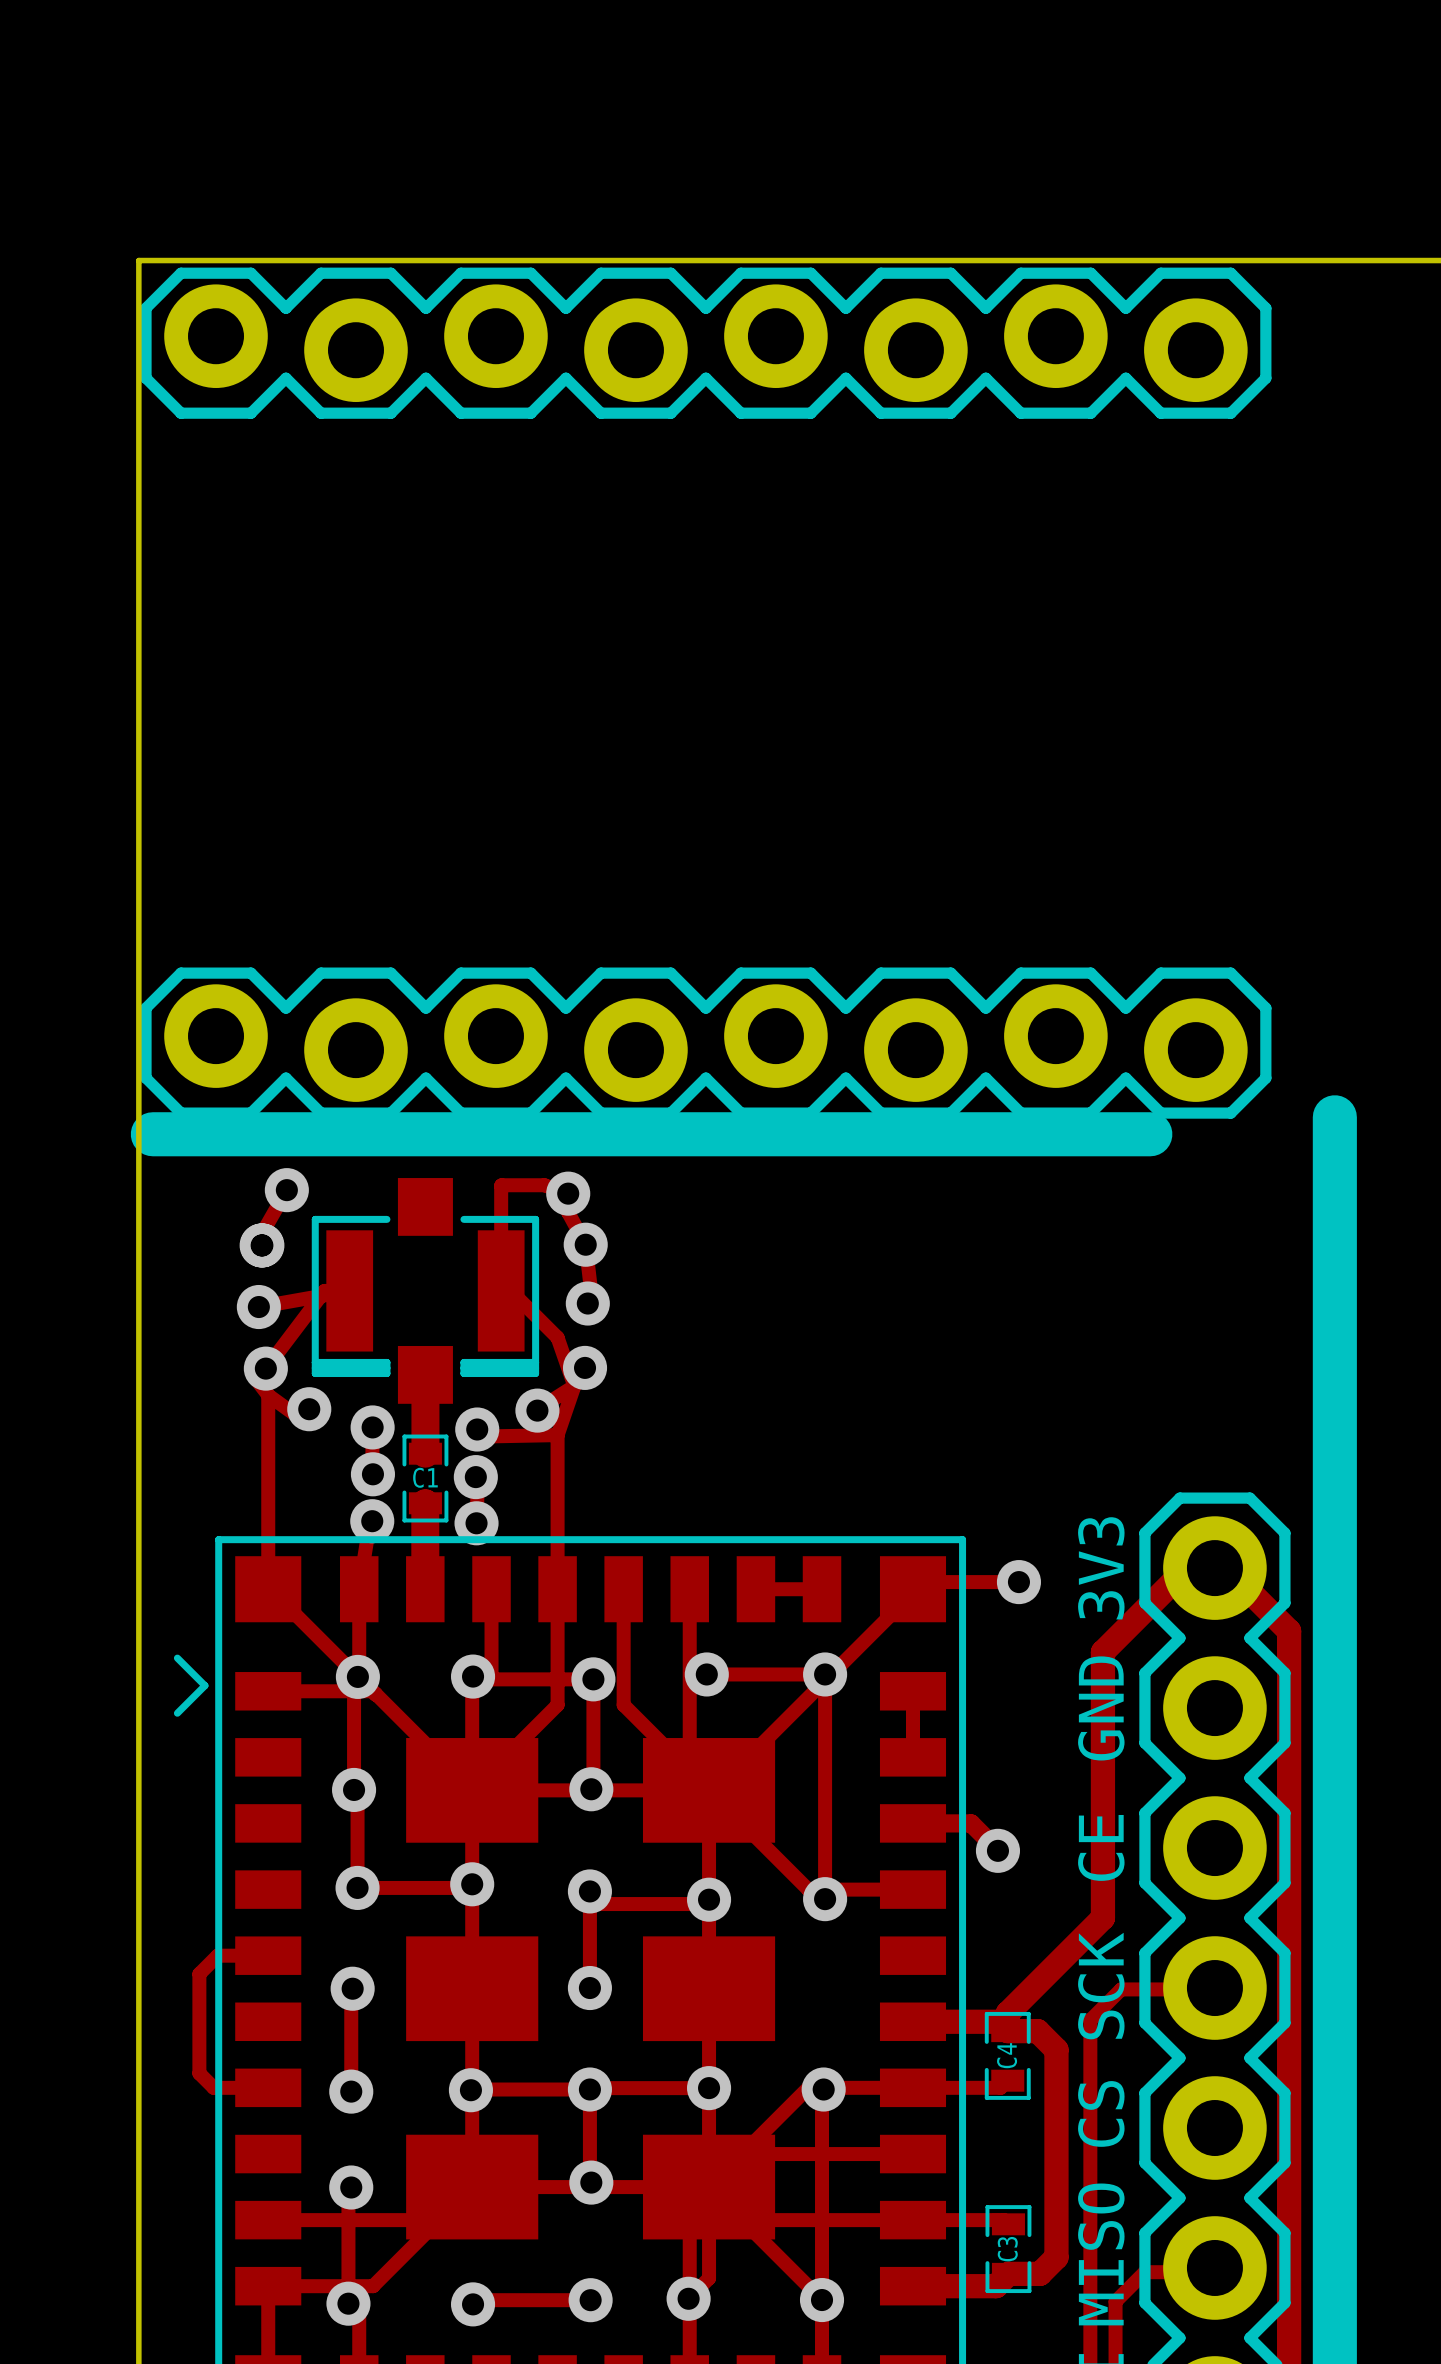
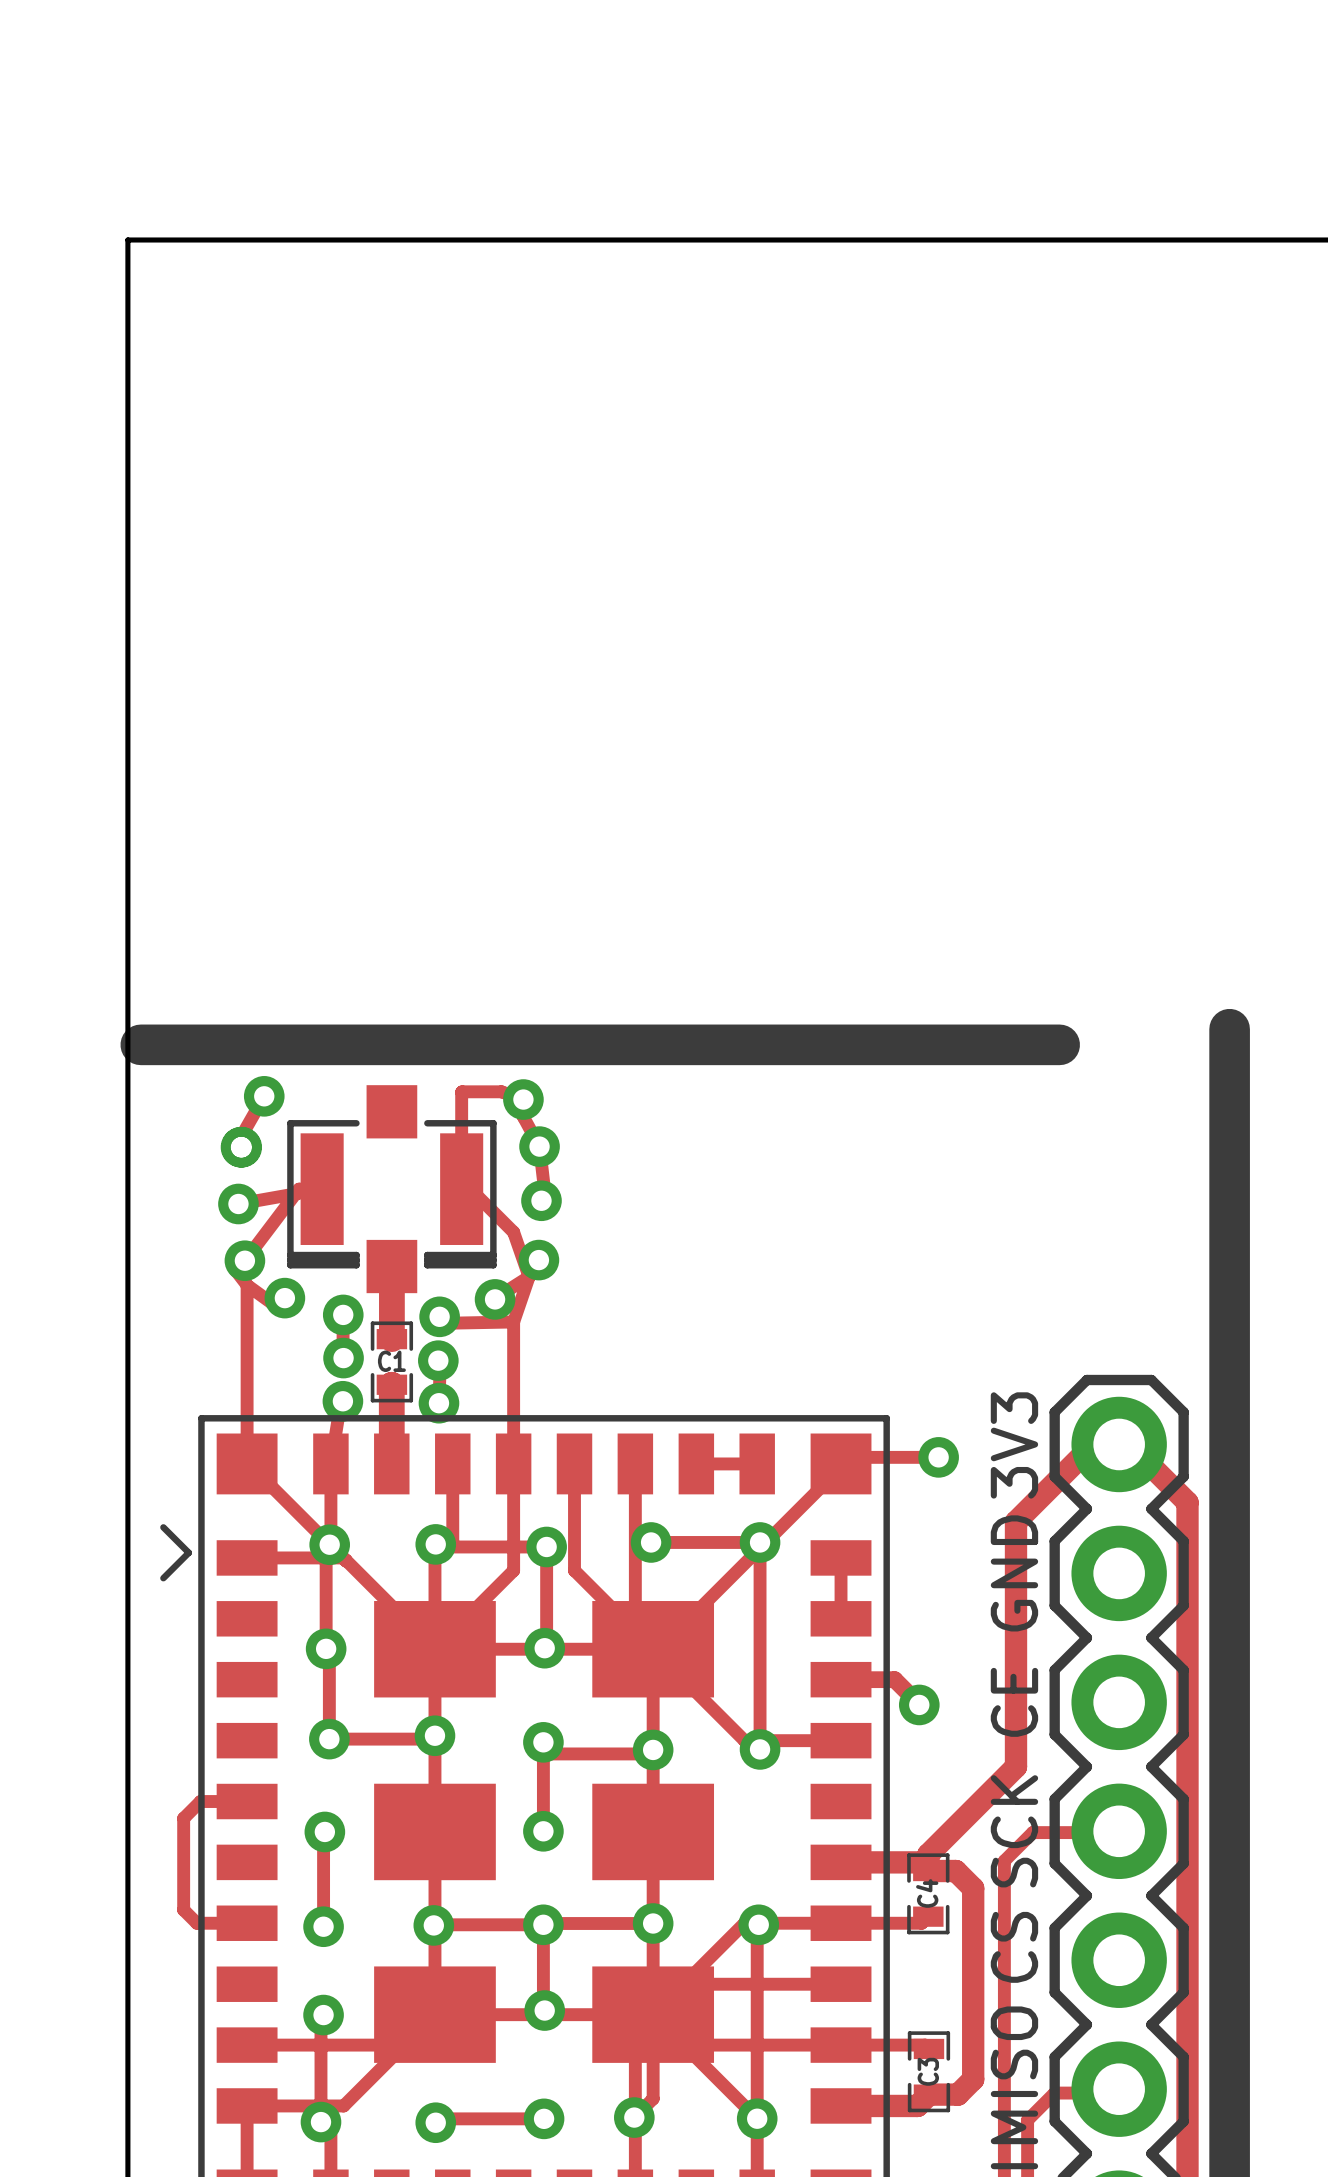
part: (705, 343) -> none
part: (705, 1043) -> none

